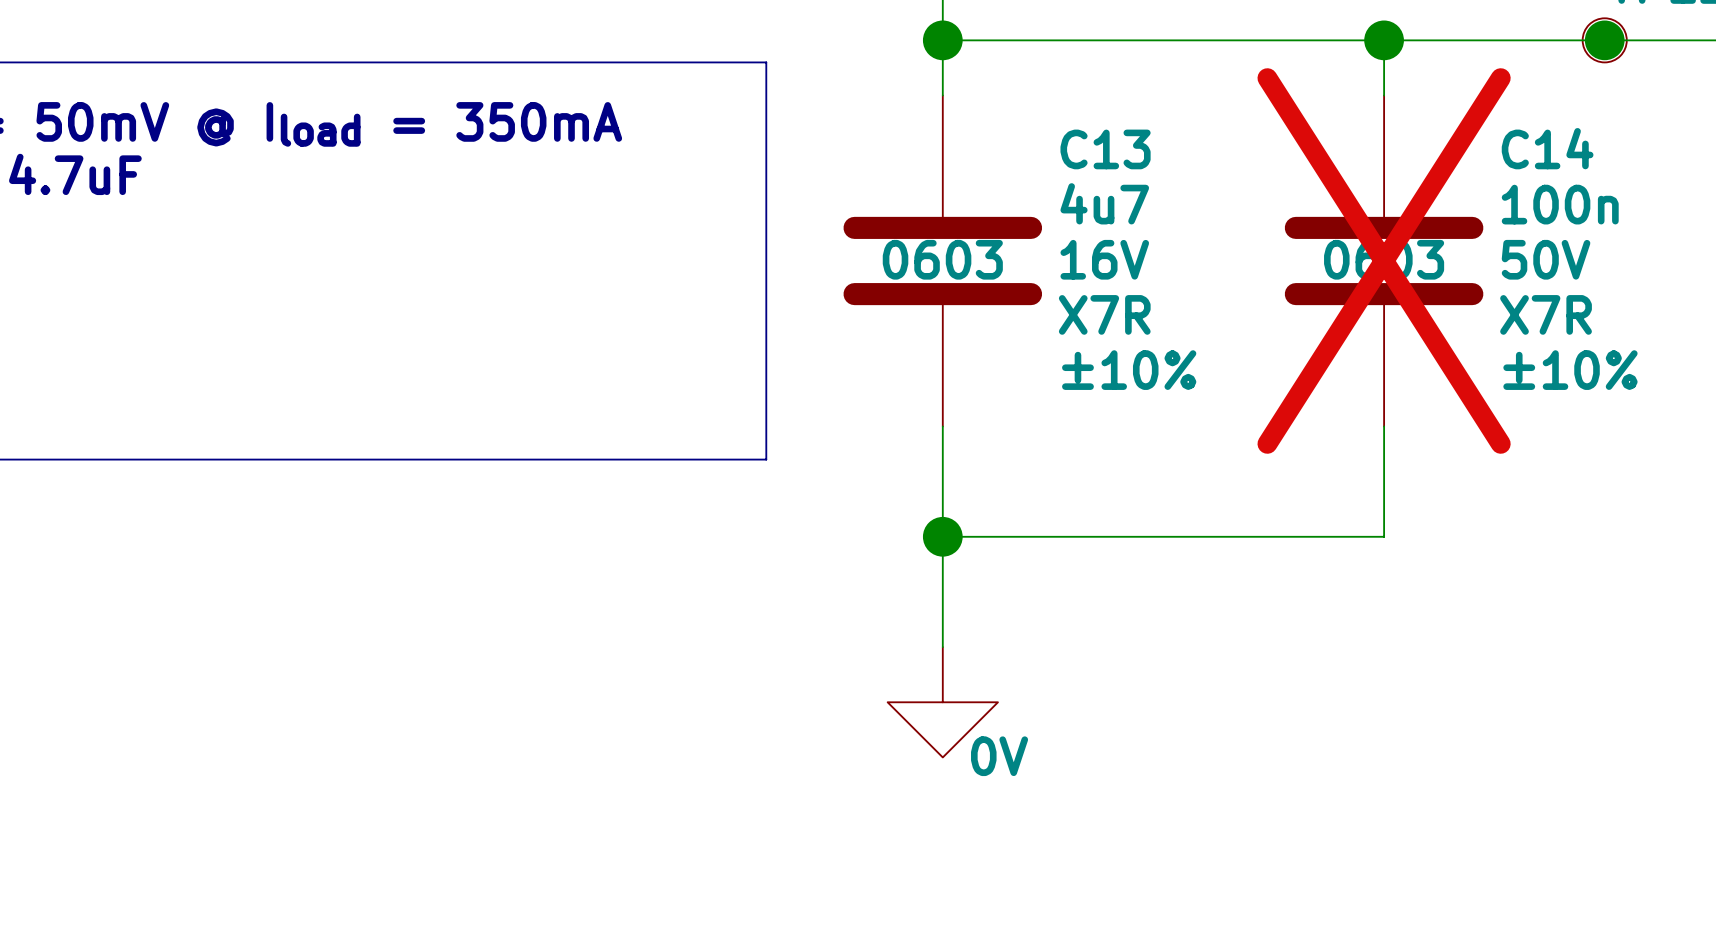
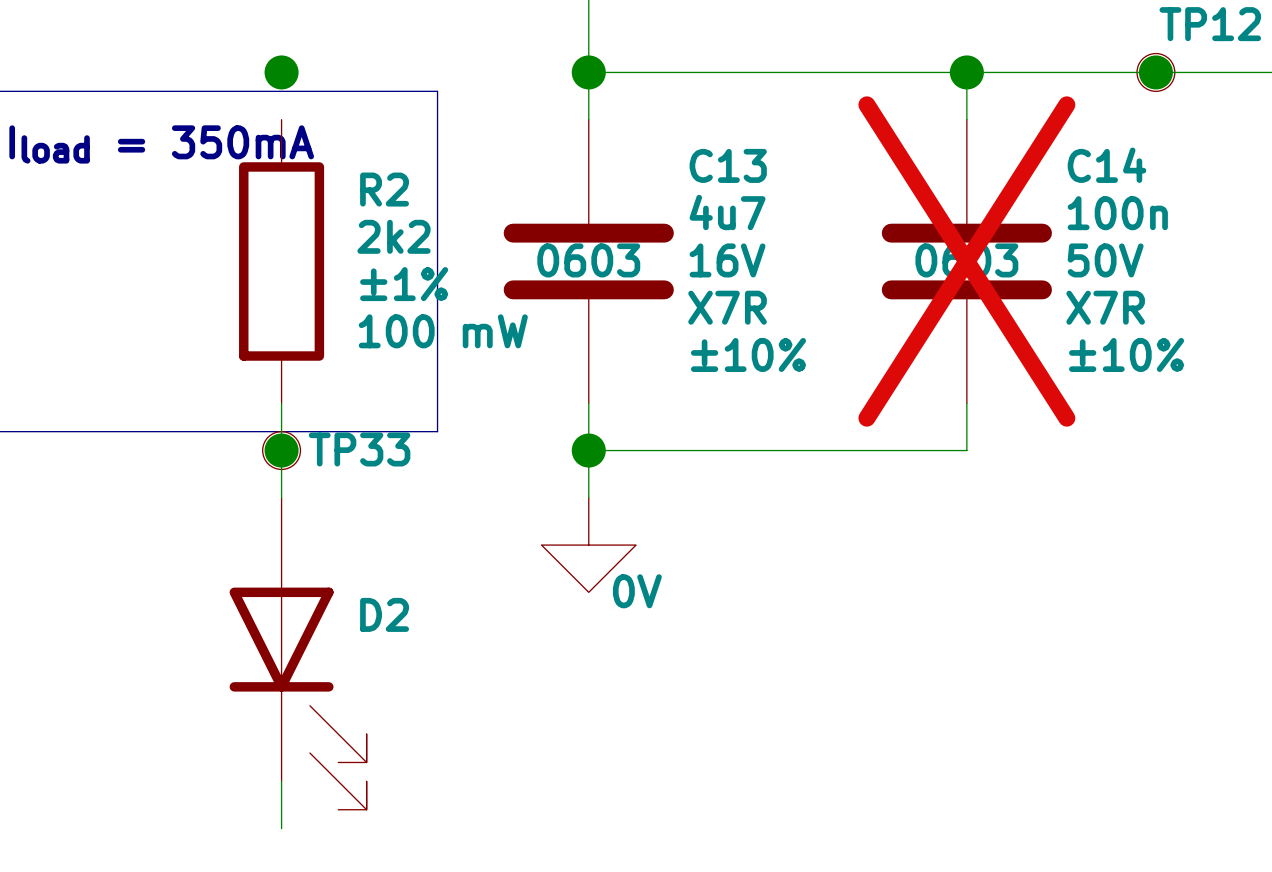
junction: none -> (281, 72)
R2: none -> 2k2 (281, 261)
wire: none -> (281, 403) (281, 497)
junction: none -> (281, 450)
TP33: none -> (281, 450)
wire: (1384, 481) (1384, 536) (942, 536) (942, 647) -> (966, 450) (588, 450)
junction position: (942, 536) -> (588, 450)
power symbol position: 0V (942, 702) -> 0V (588, 545)
D2: none -> (298, 653)
wire: none -> (281, 781) (281, 828)

